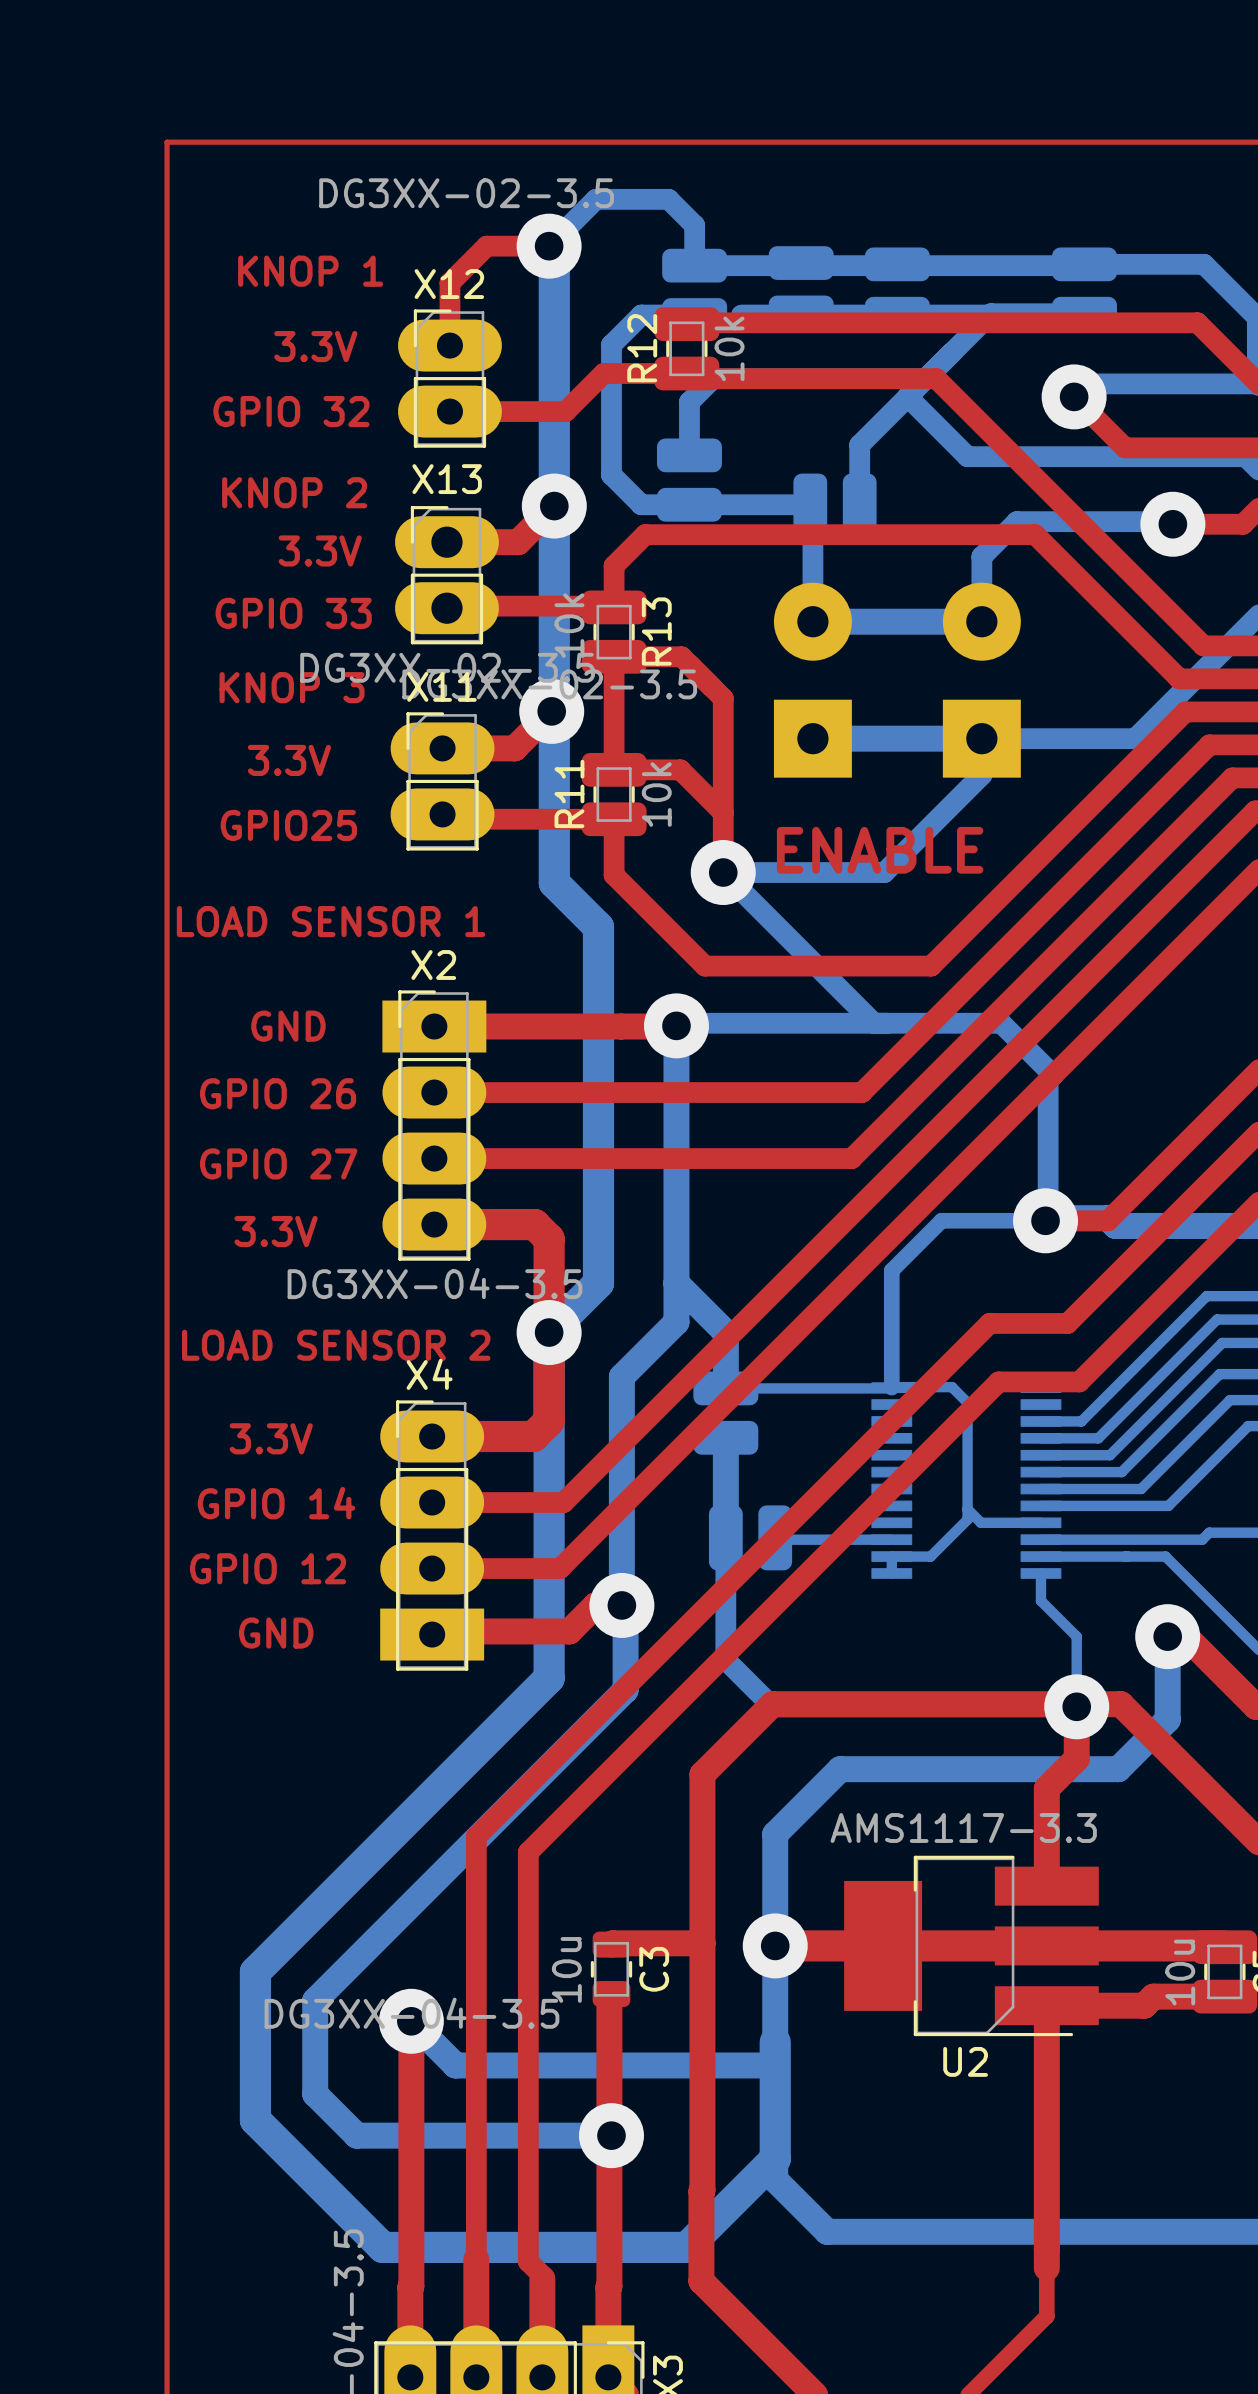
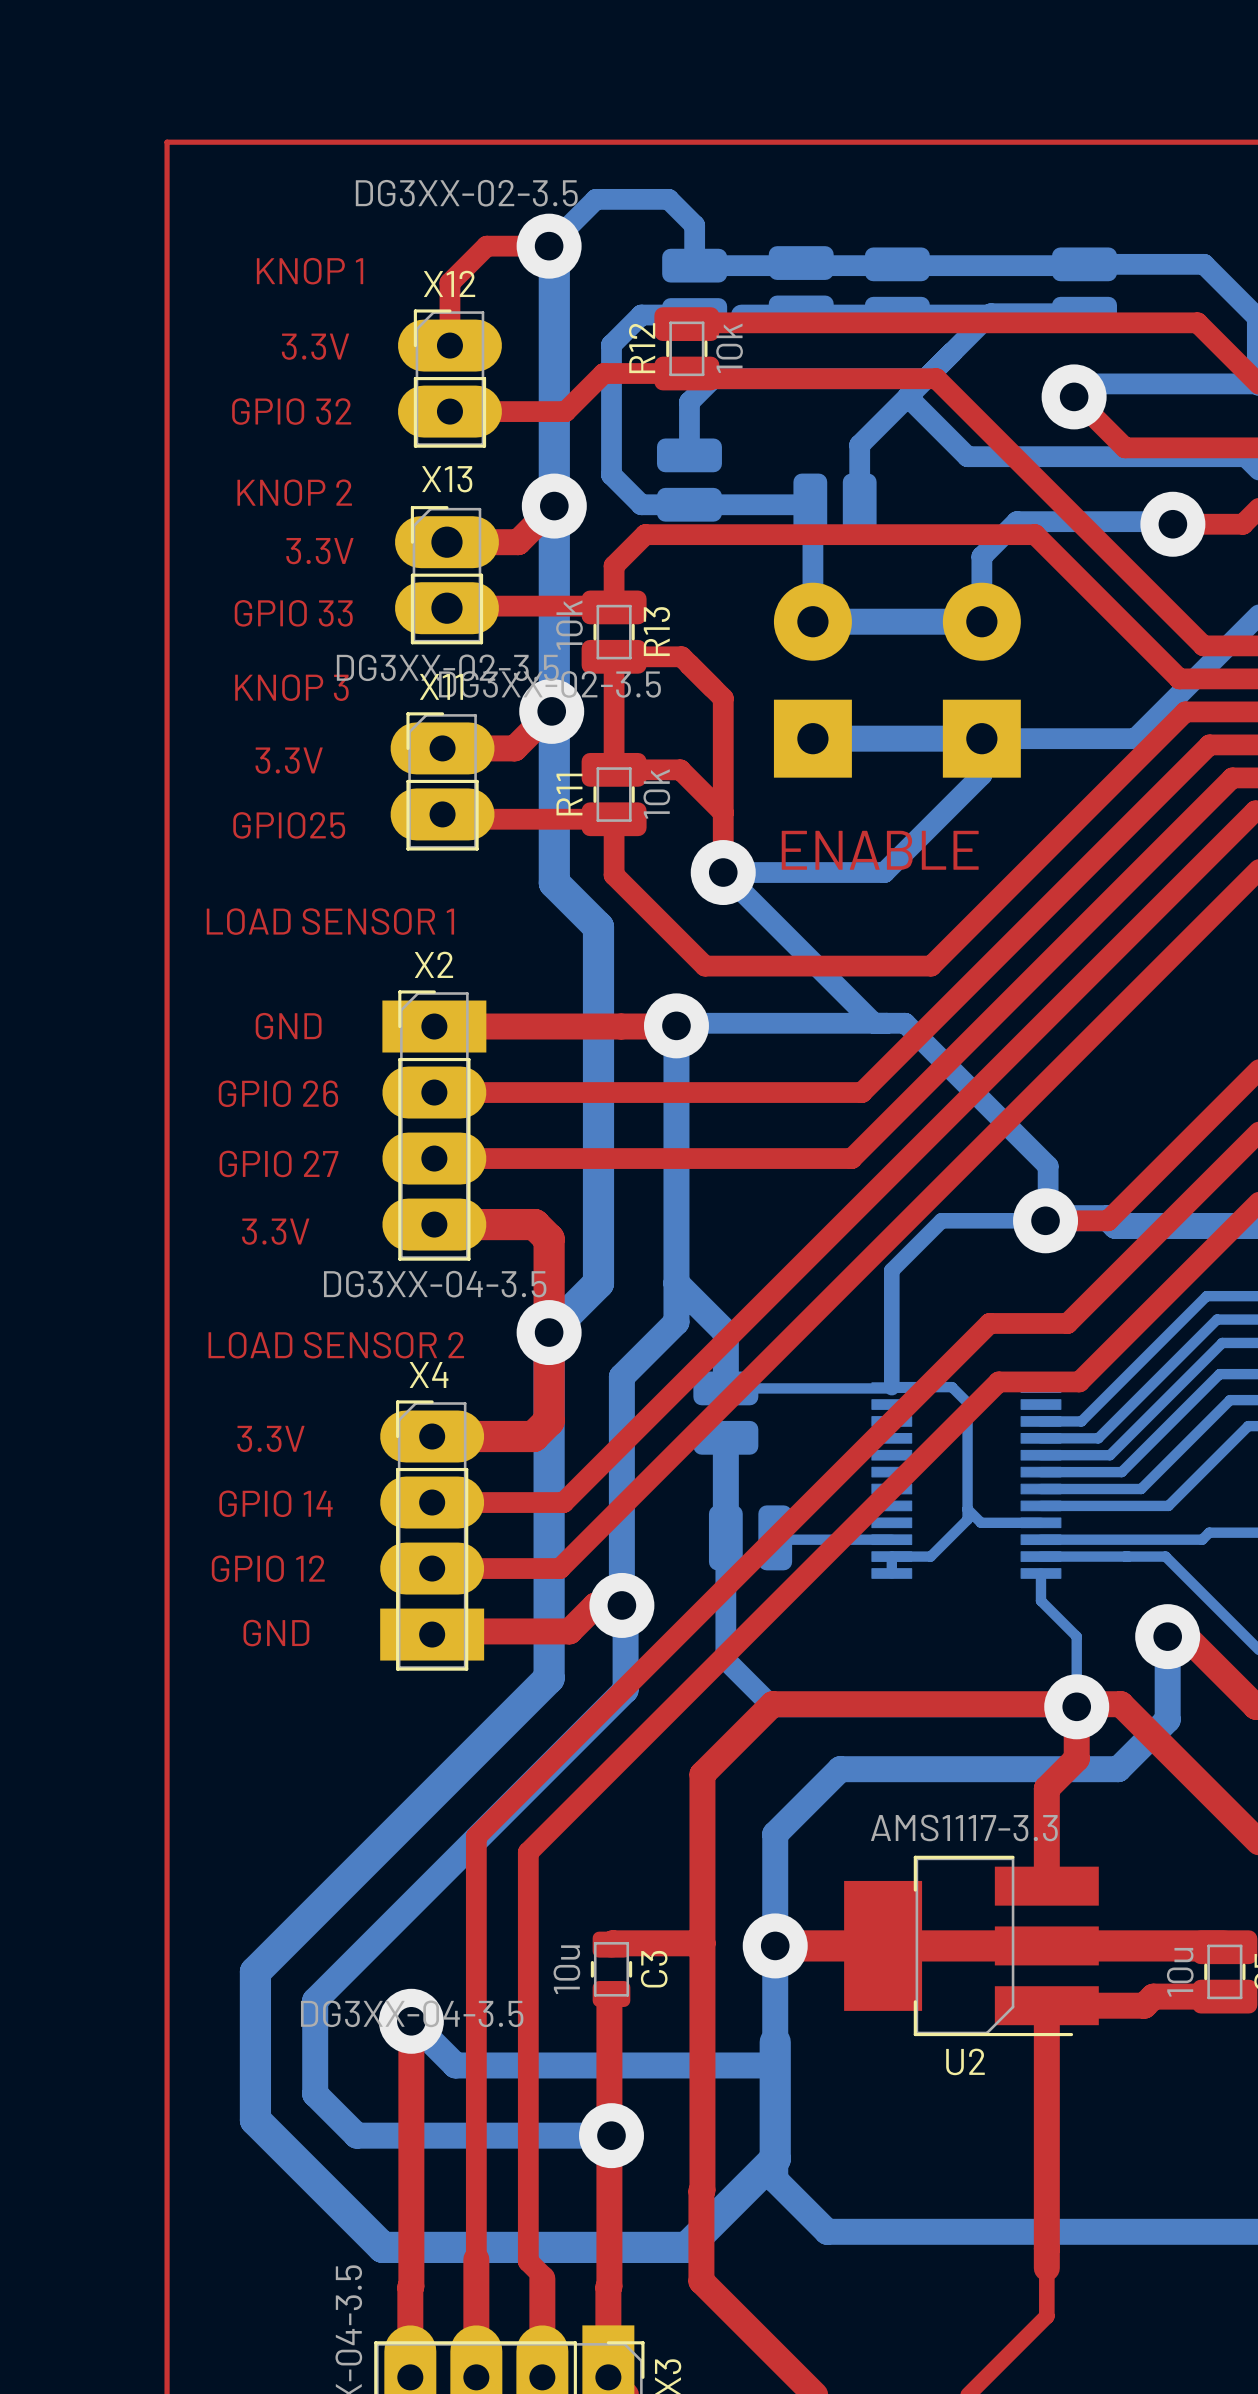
bottom track: (905, 1023) (1001, 1023) (1053, 1075) (1048, 1080) (1048, 1166) -> (905, 1023) (1048, 1166)

